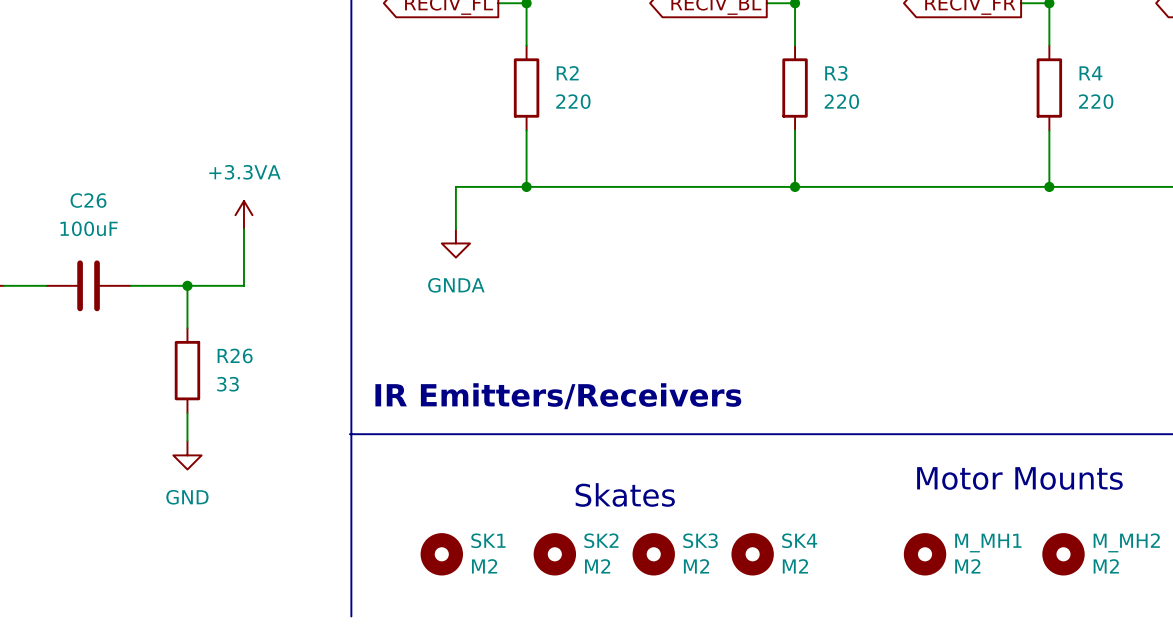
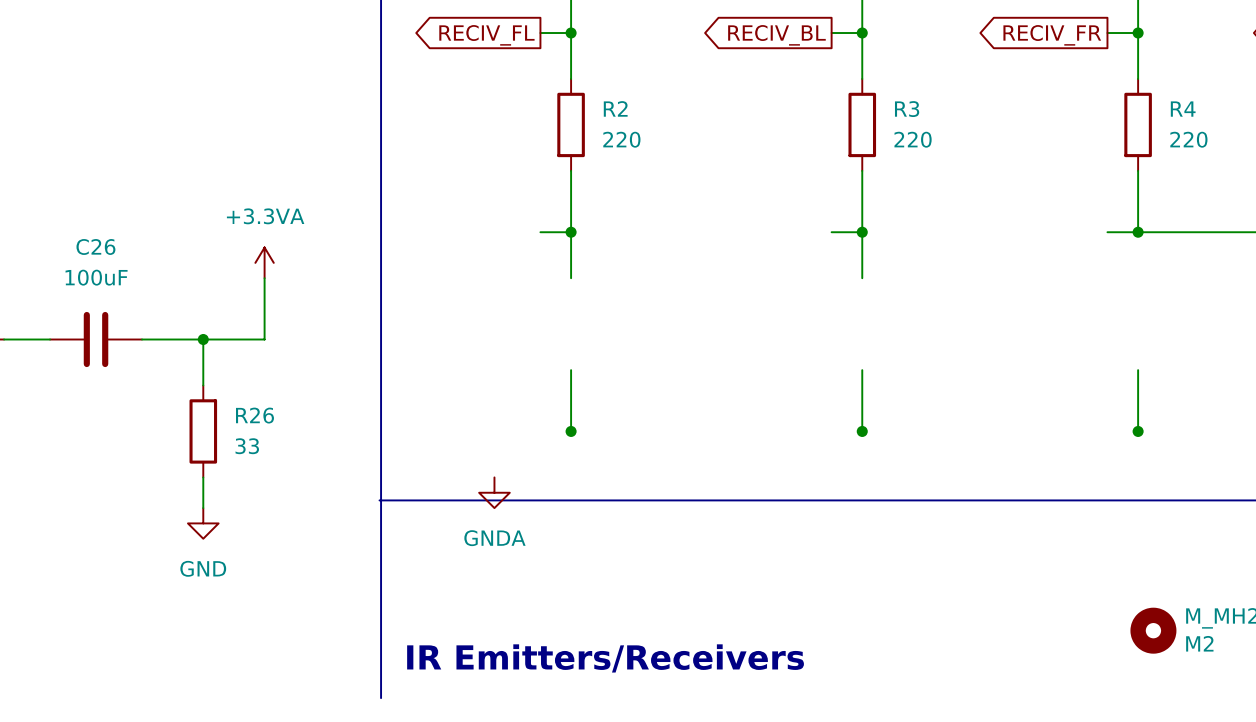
wire: (498, 186) (455, 186) (455, 229) -> none
wire: (526, 186) (766, 186) -> (571, 232) (571, 278)
wire: (795, 186) (1021, 186) -> (862, 232) (862, 278)
power symbol position: GNDA (455, 243) -> GNDA (494, 492)
wire: none -> (571, 370) (571, 431)
wire: none -> (862, 370) (862, 431)
wire: none -> (1138, 370) (1138, 431)
junction: none -> (571, 431)
junction: none -> (862, 431)
junction: none -> (1138, 431)
text position: IR Emitters/Receivers (558, 396) -> IR Emitters/Receivers (605, 658)
text: Motor Mounts (1019, 478) -> none
text: Skates (625, 494) -> none
SK1: M2 (441, 554) -> none
SK2: M2 (554, 554) -> none
SK3: M2 (653, 554) -> none
SK4: M2 (752, 554) -> none
M_MH1: M2 (925, 554) -> none

